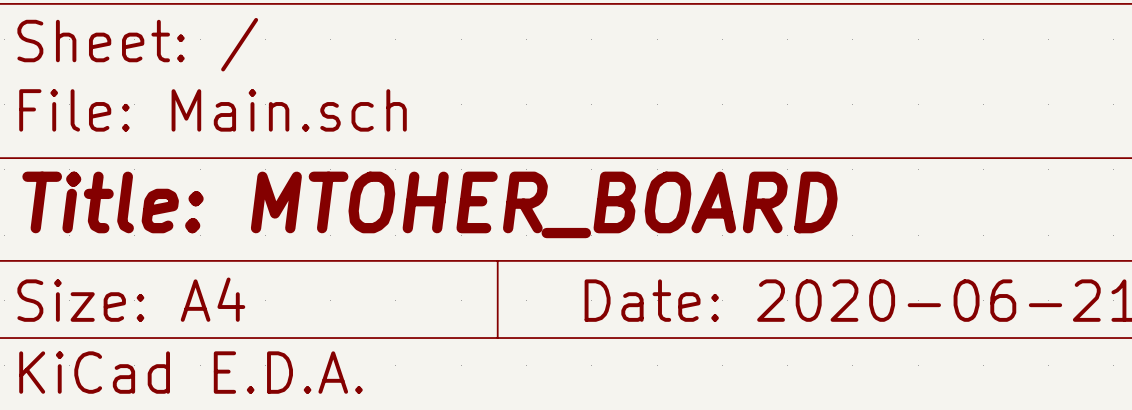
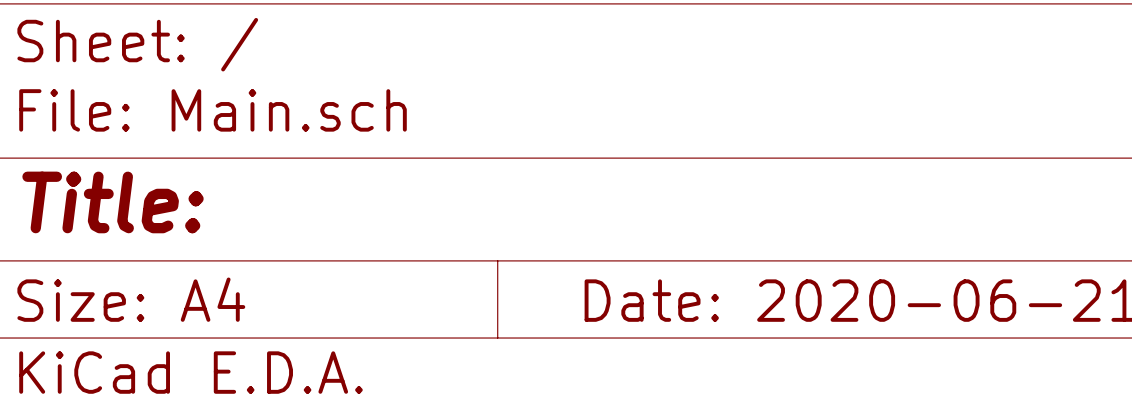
title block: Title: MTOHER_BOARD (429, 204) -> Title: (113, 202)

